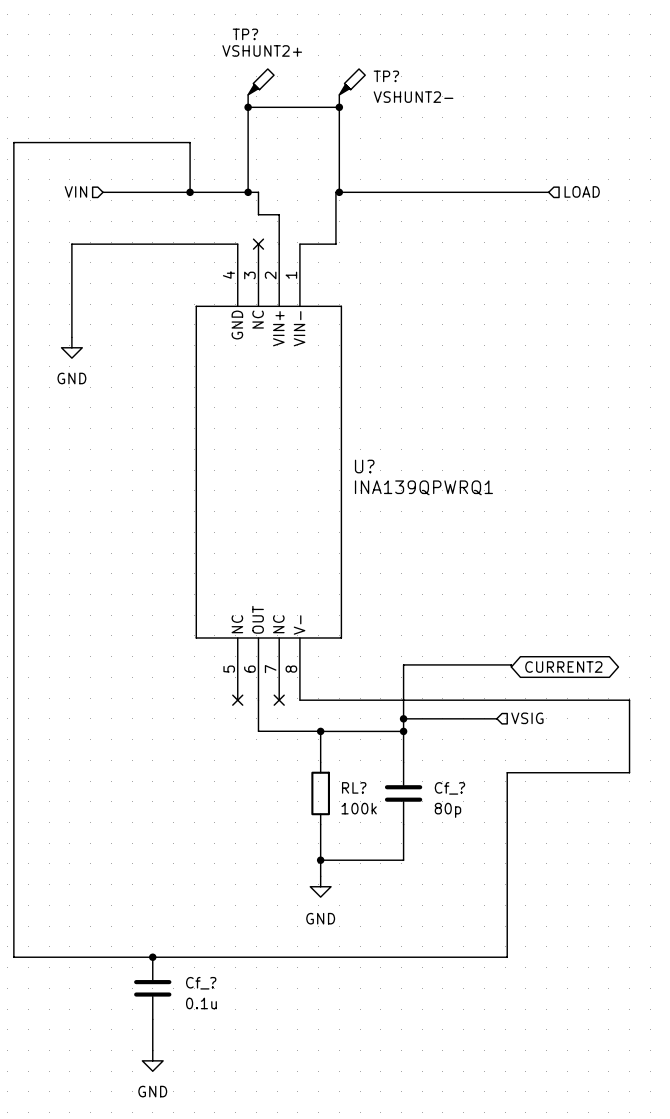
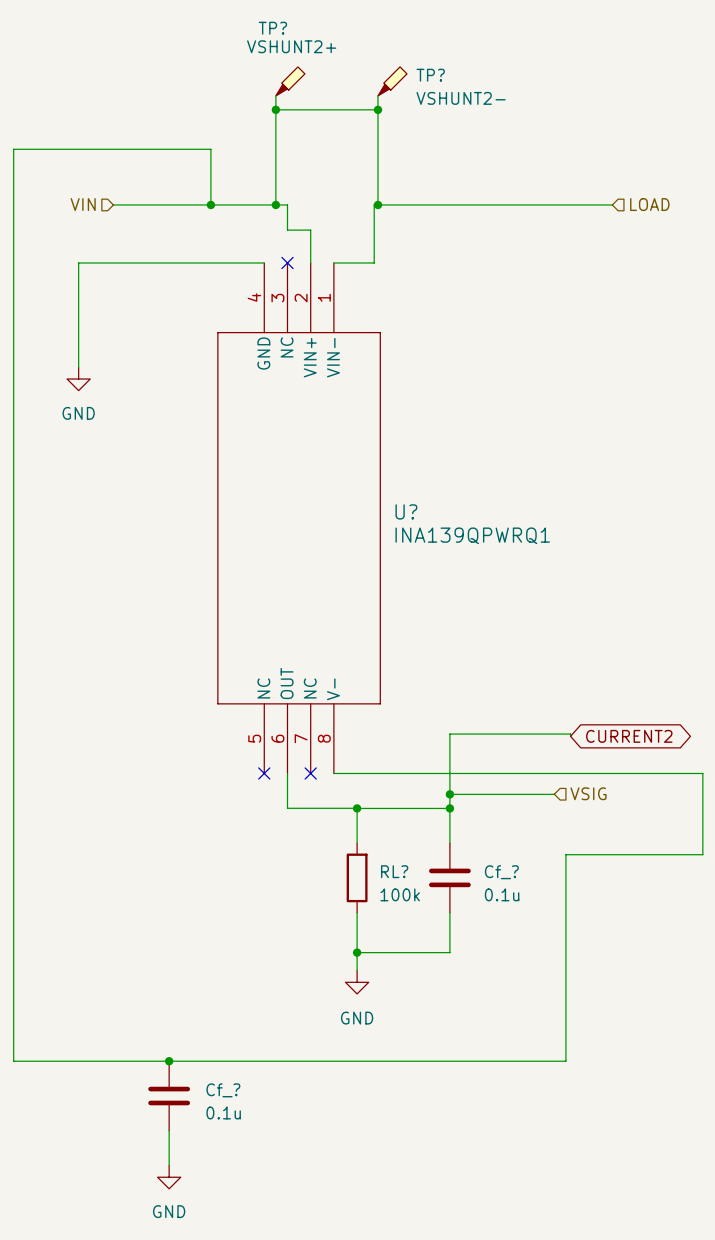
Cf_? value: 80p (447, 810) -> 0.1u (502, 894)

